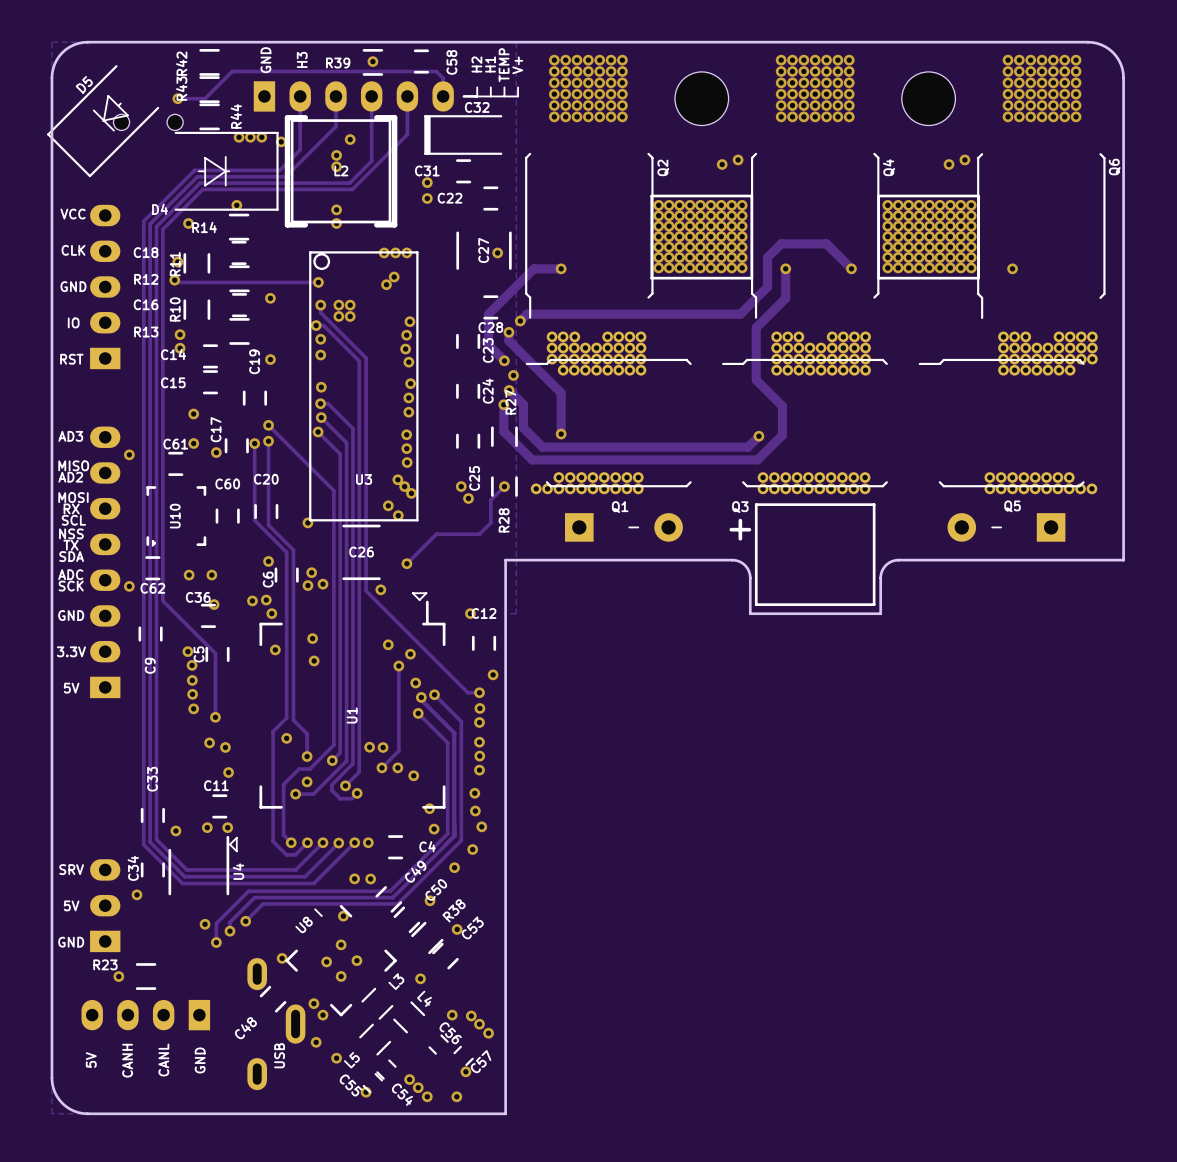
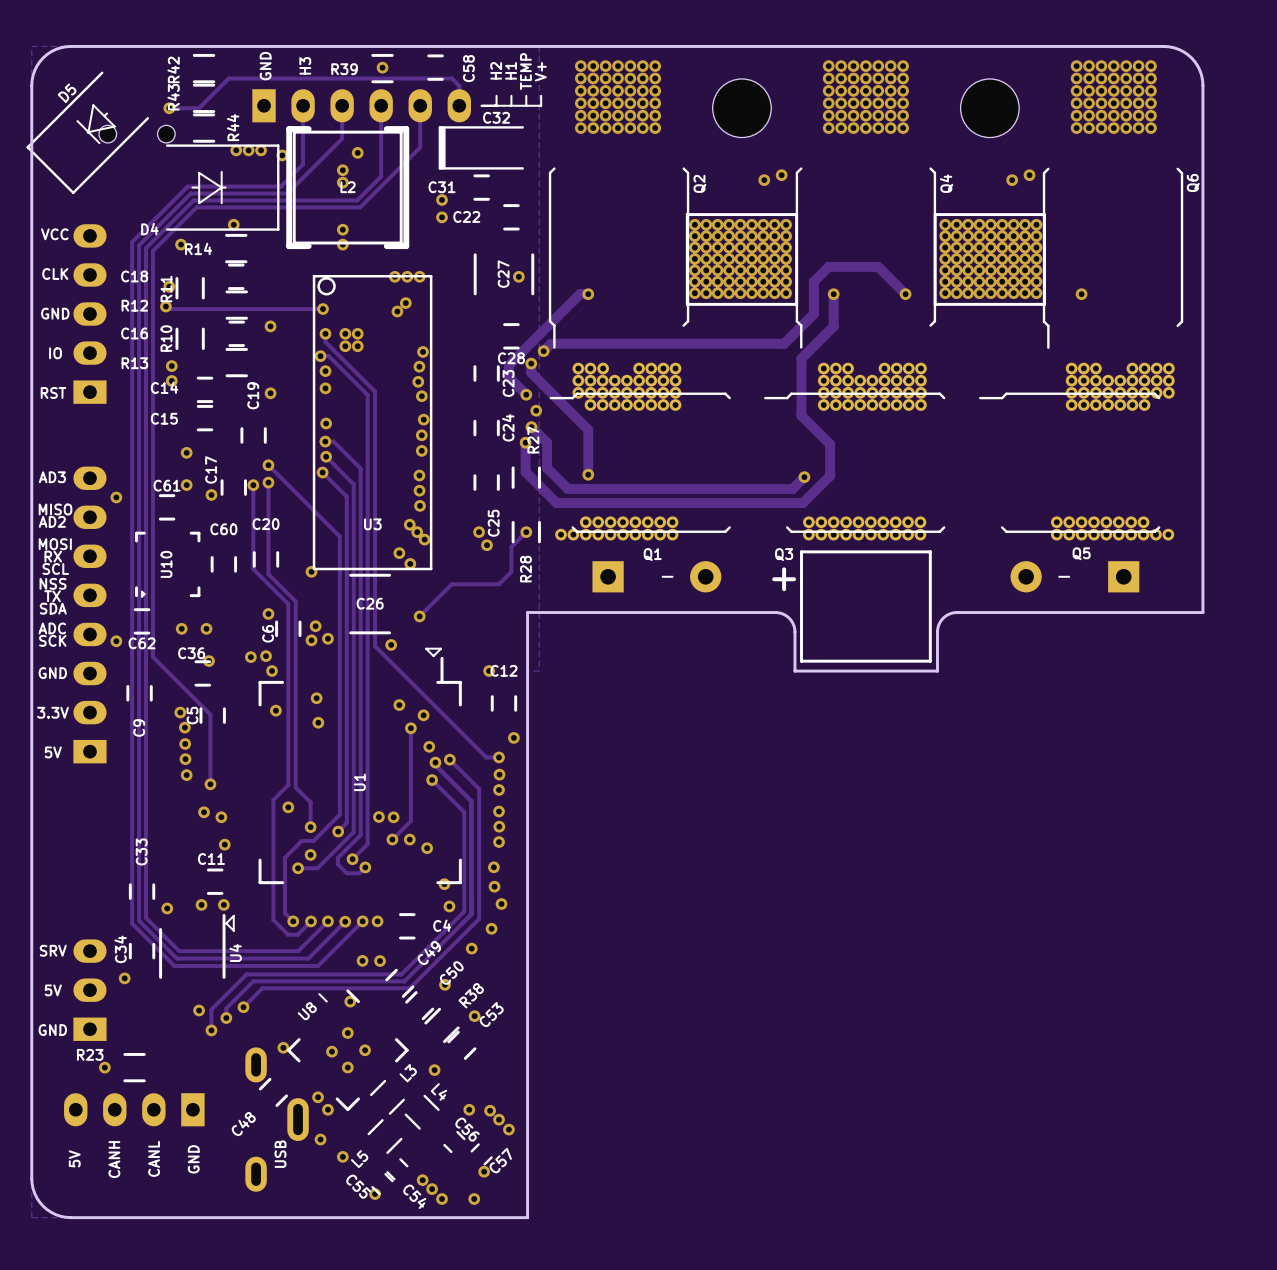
track: (553, 268) (533, 268) (488, 314) (488, 333) -> (579, 294) (508, 365)

